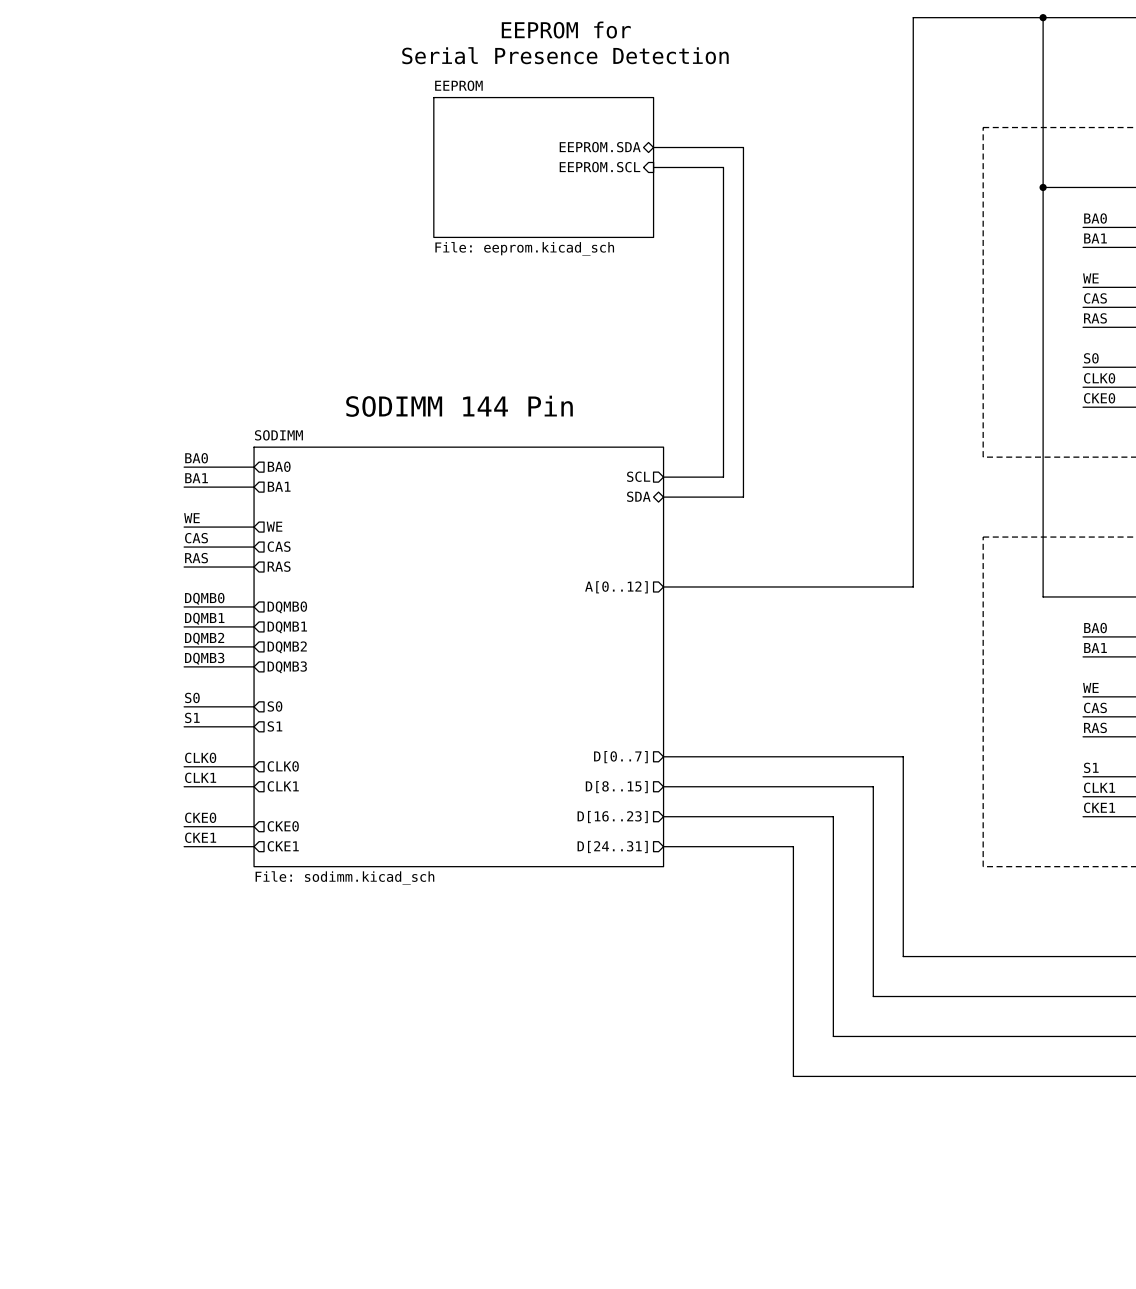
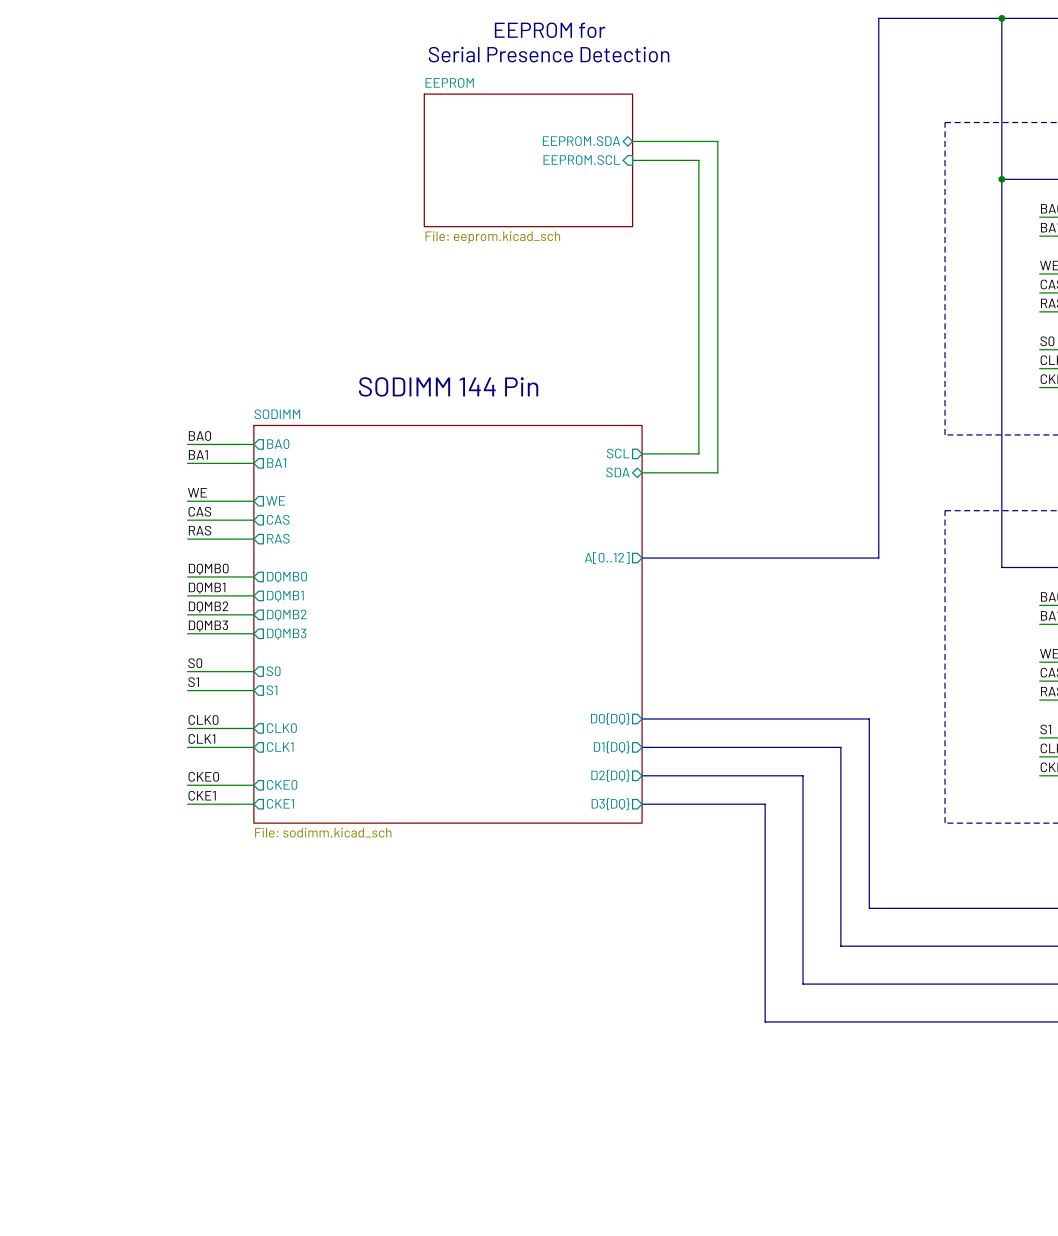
sheet pin: D[0..7] (620, 757) -> D0{DQ} (610, 718)
sheet pin: D[8..15] (616, 787) -> D1{DQ} (611, 747)
sheet pin: D[16..23] (612, 817) -> D2{DQ} (610, 775)
sheet pin: D[24..31] (612, 847) -> D3{DQ} (610, 804)

